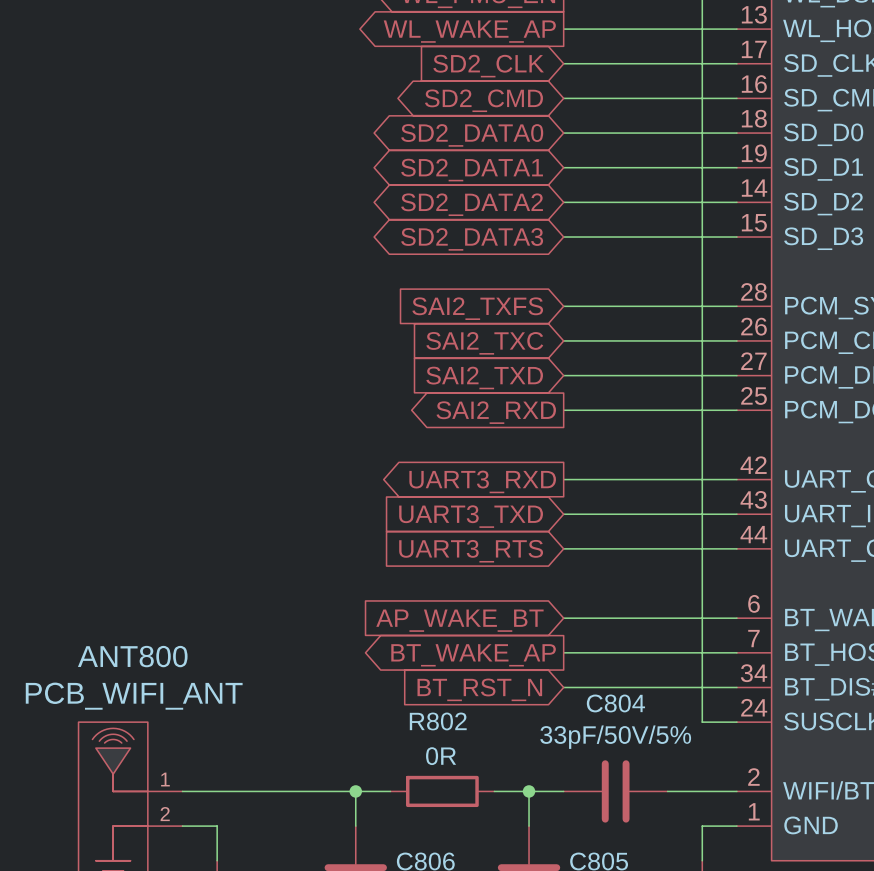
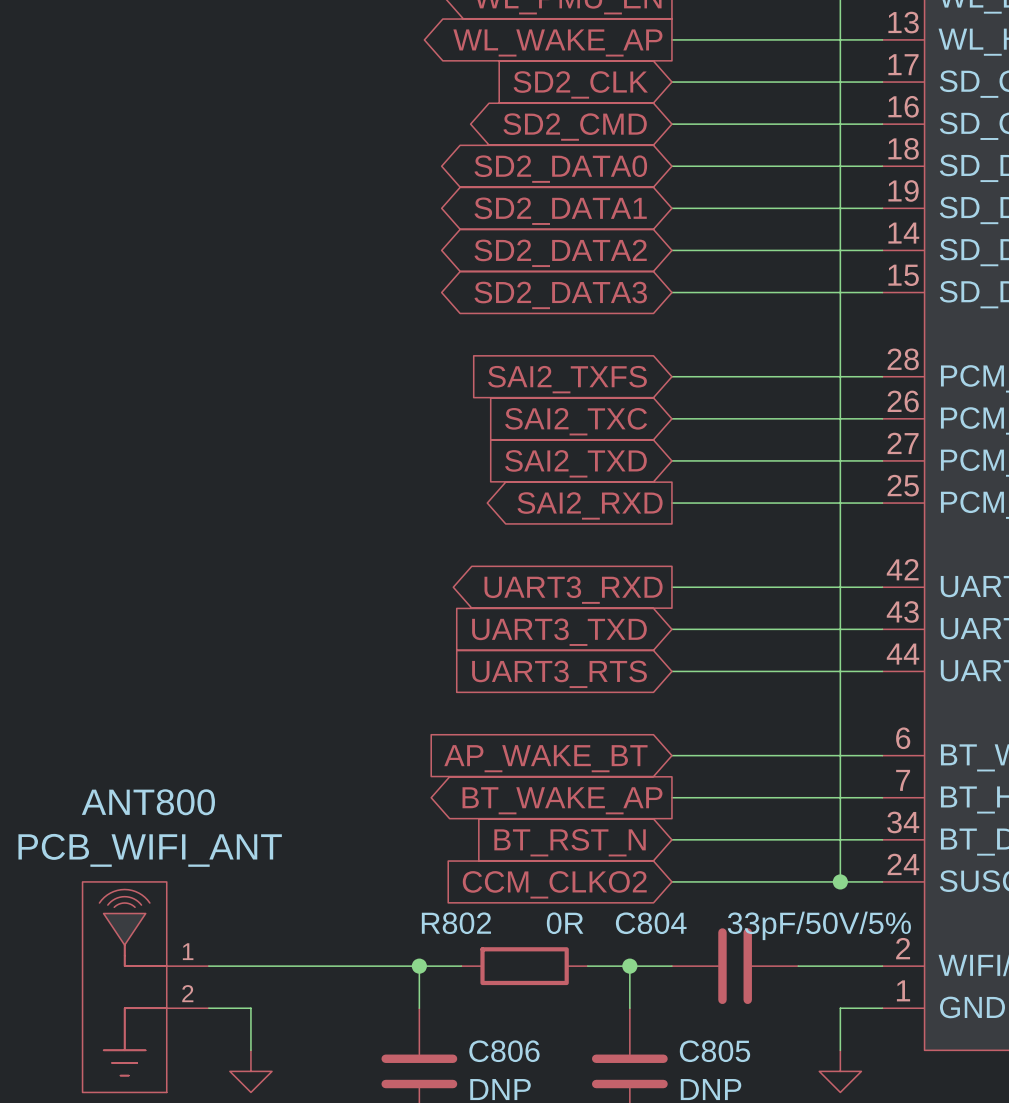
C804 name position: C804 (615, 703) -> C804 (651, 923)
R802 name position: R802 (438, 721) -> R802 (456, 923)
wire: none -> (671, 881) (840, 881)
junction: none -> (840, 881)
global label: none -> CCM_CLKO2 (554, 884)
C804 value position: 33pF/50V/5% (615, 737) -> 33pF/50V/5% (819, 925)
R802 value position: 0R (441, 756) -> 0R (565, 923)

